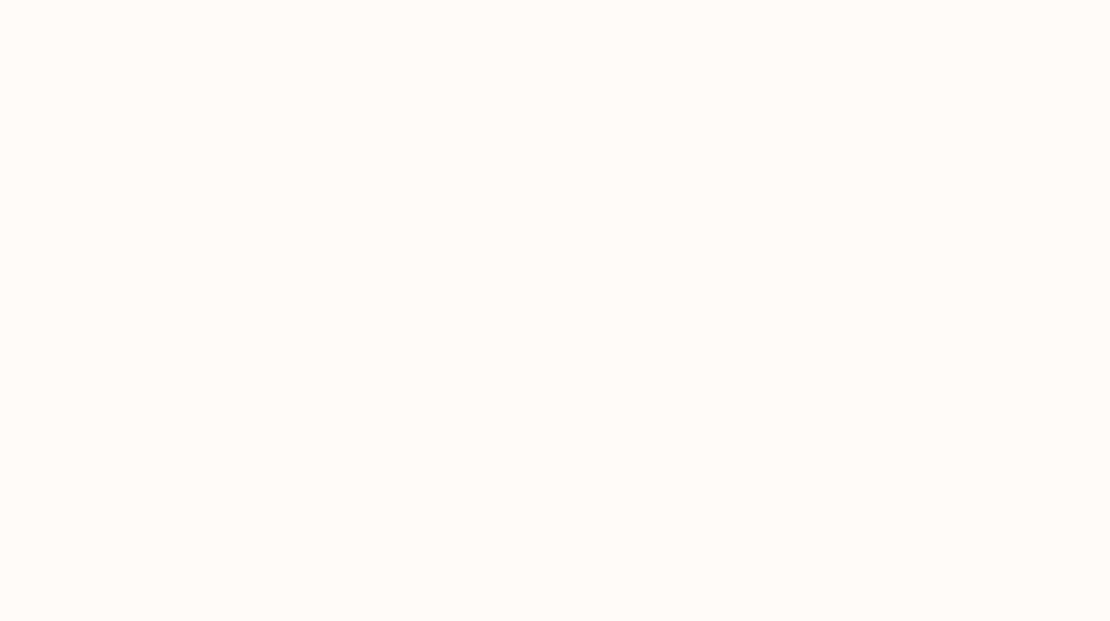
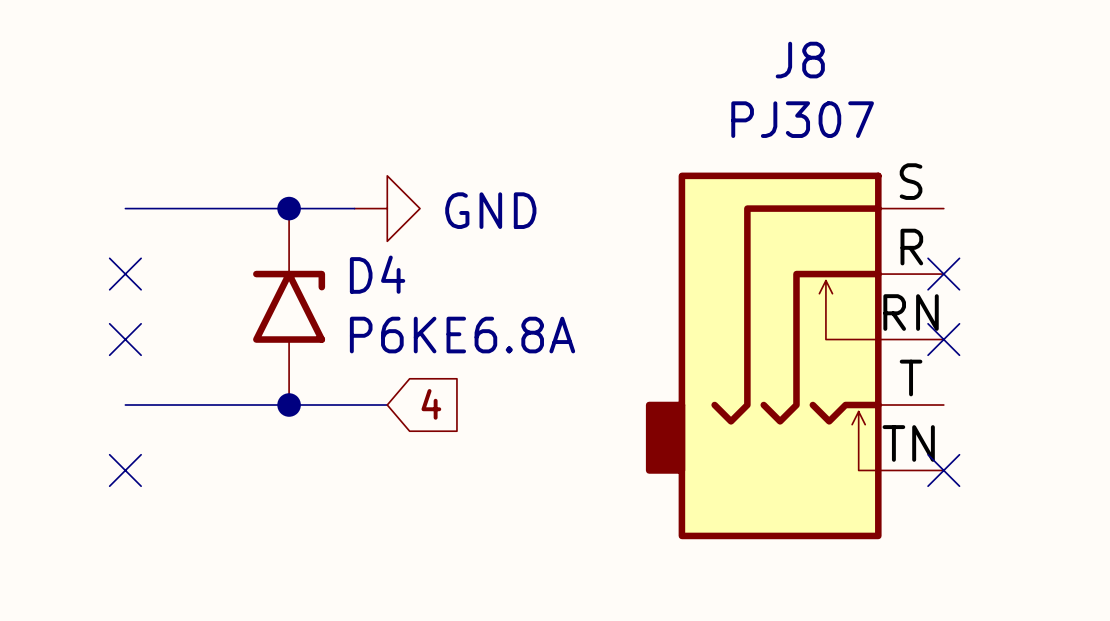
wire: none -> (125, 208) (354, 208)
junction: none -> (289, 208)
power symbol: none -> GND (387, 208)
no-connect mark: none -> (125, 274)
no-connect mark: none -> (943, 274)
D4: none -> P6KE6.8A (289, 306)
no-connect mark: none -> (125, 339)
no-connect mark: none -> (943, 339)
J8: none -> PJ307 (794, 355)
global label: none -> 4 (431, 404)
wire: none -> (125, 405) (387, 405)
junction: none -> (289, 405)
no-connect mark: none -> (125, 470)
no-connect mark: none -> (943, 470)

